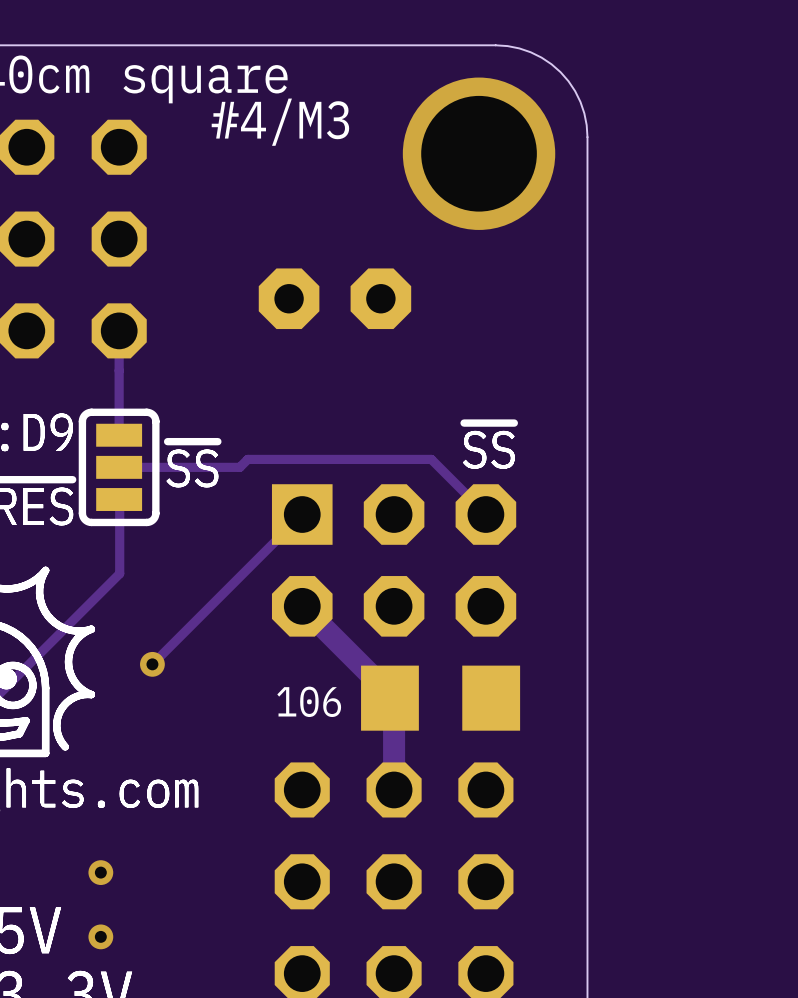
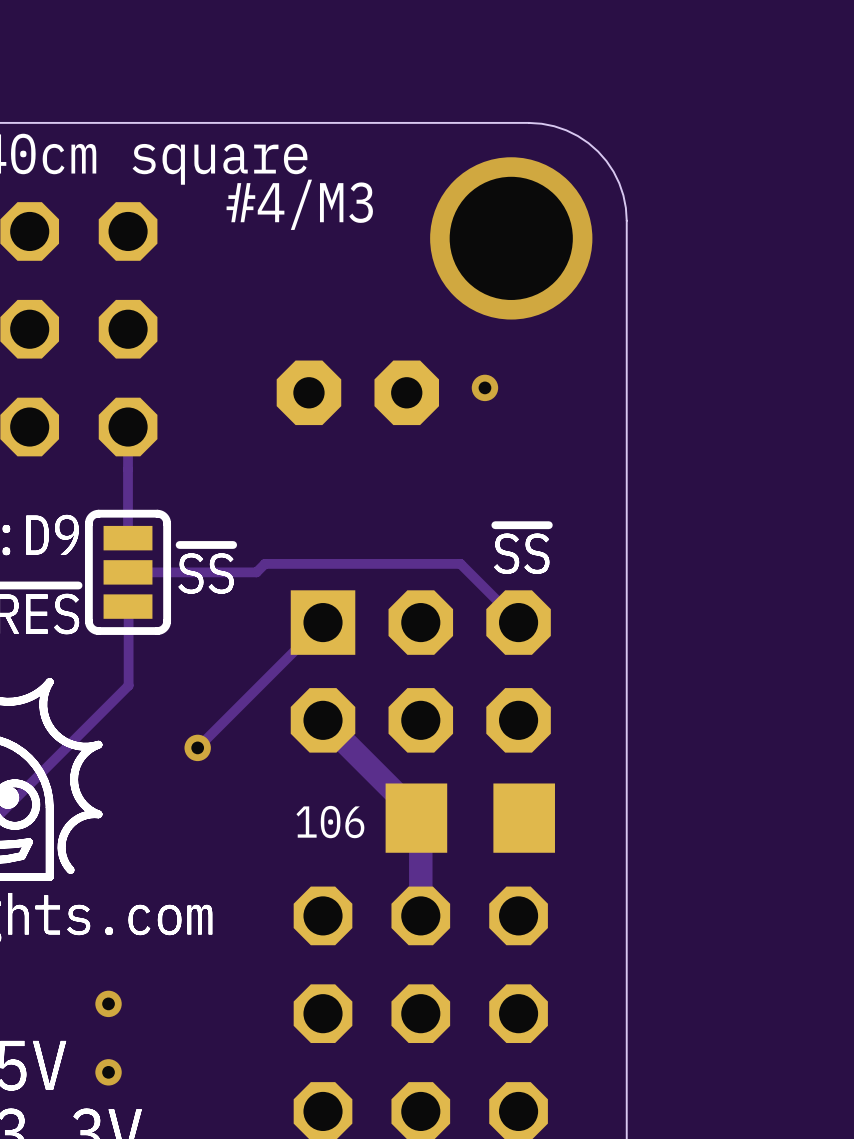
via: none -> (484, 387)
track: (184, 632) (152, 664) -> none
via position: (152, 664) -> (197, 747)

